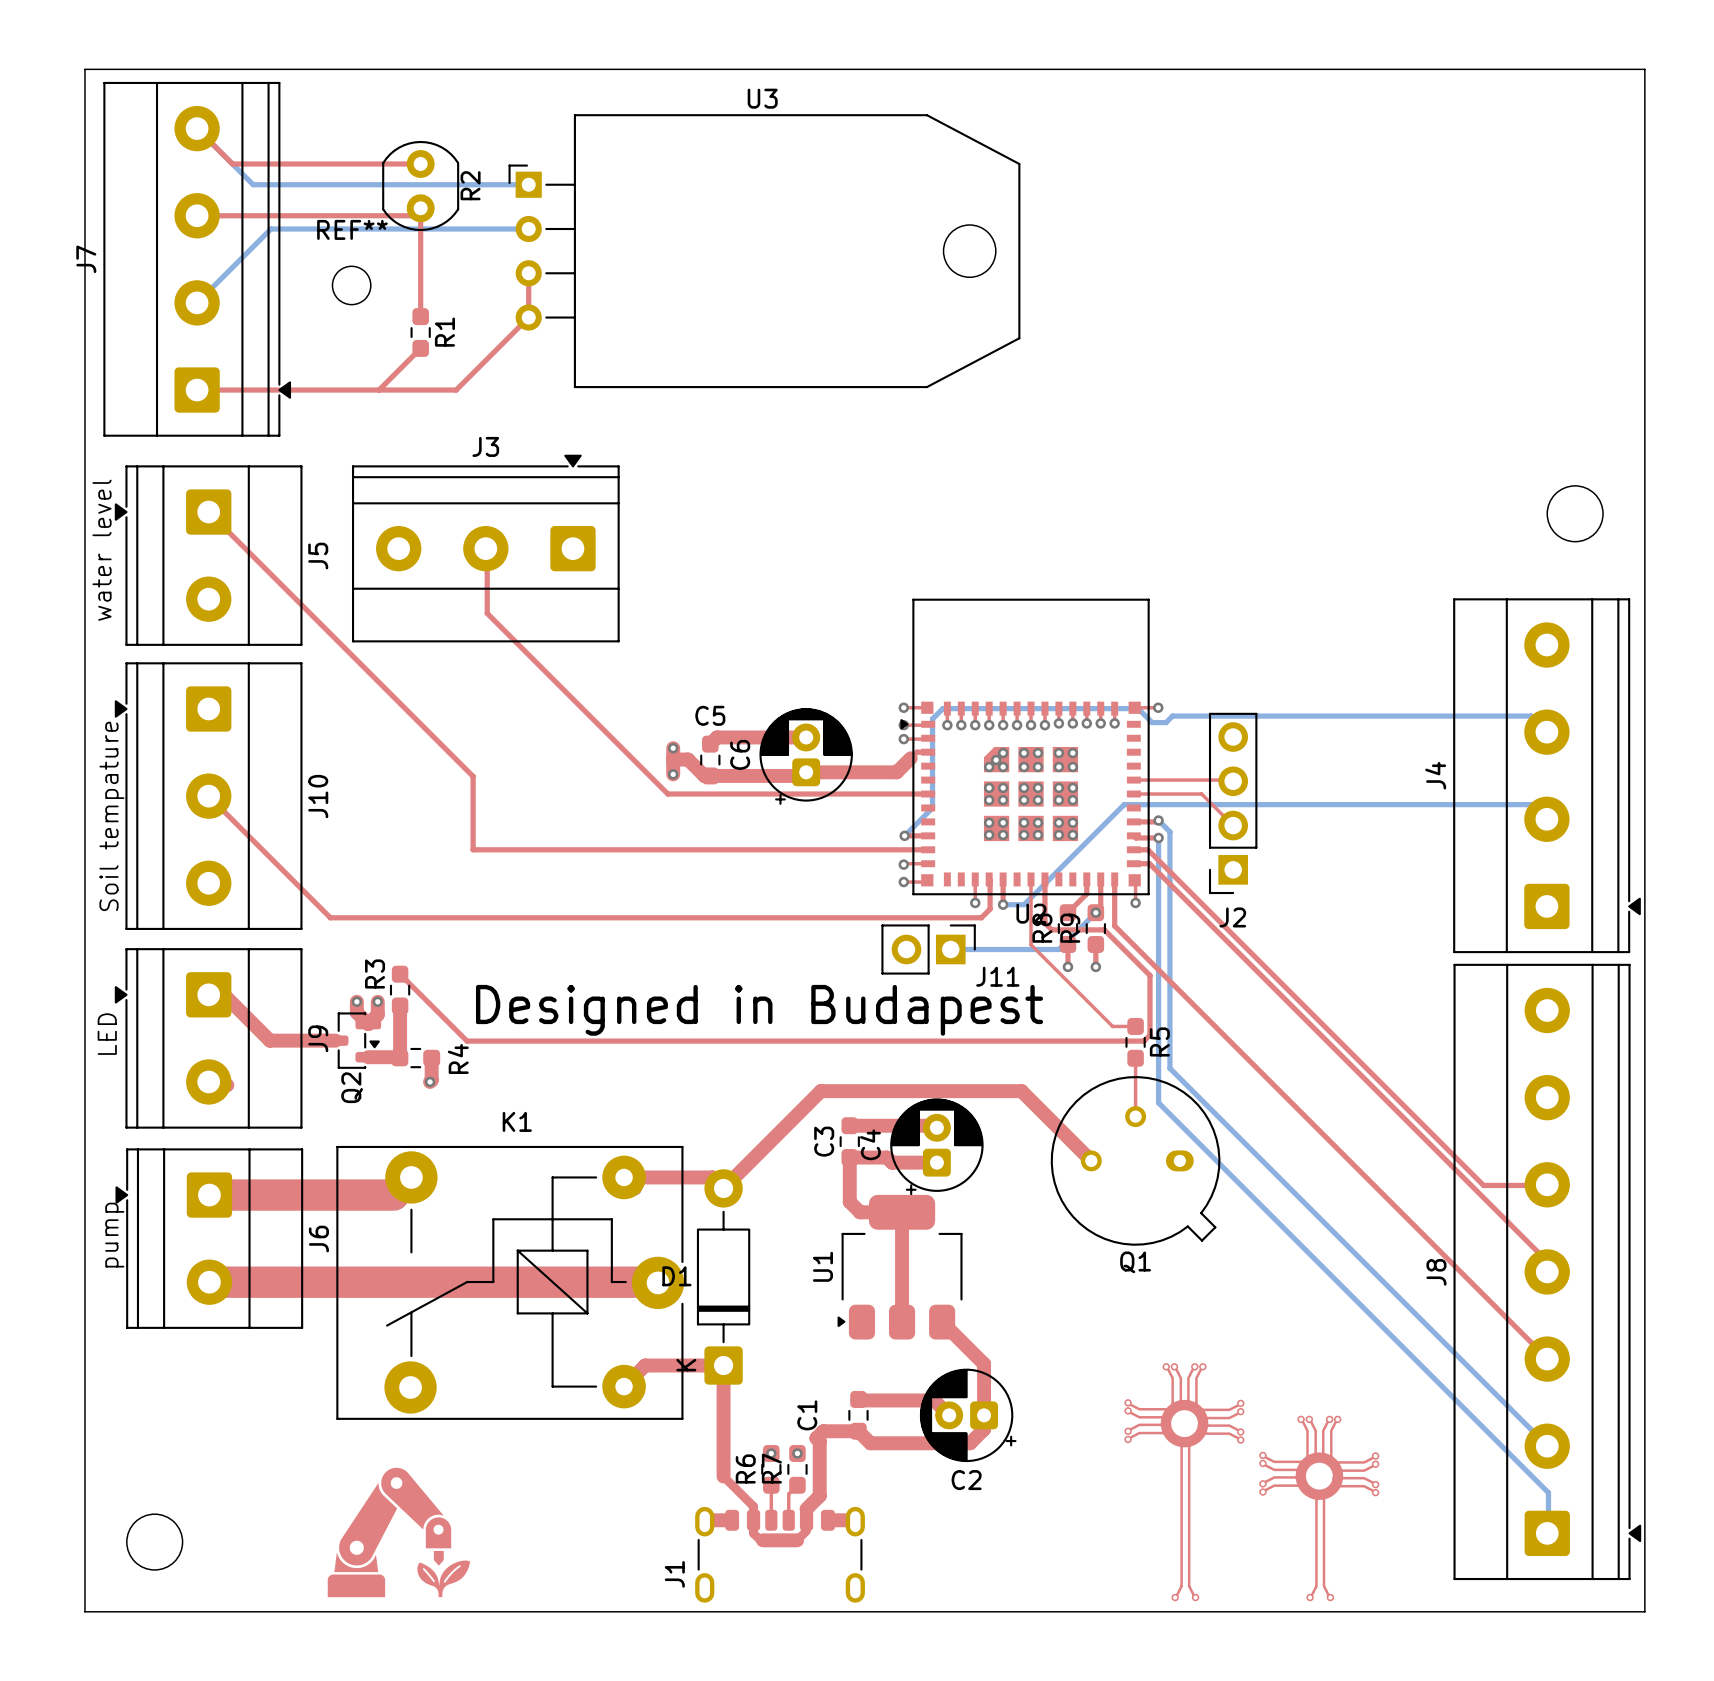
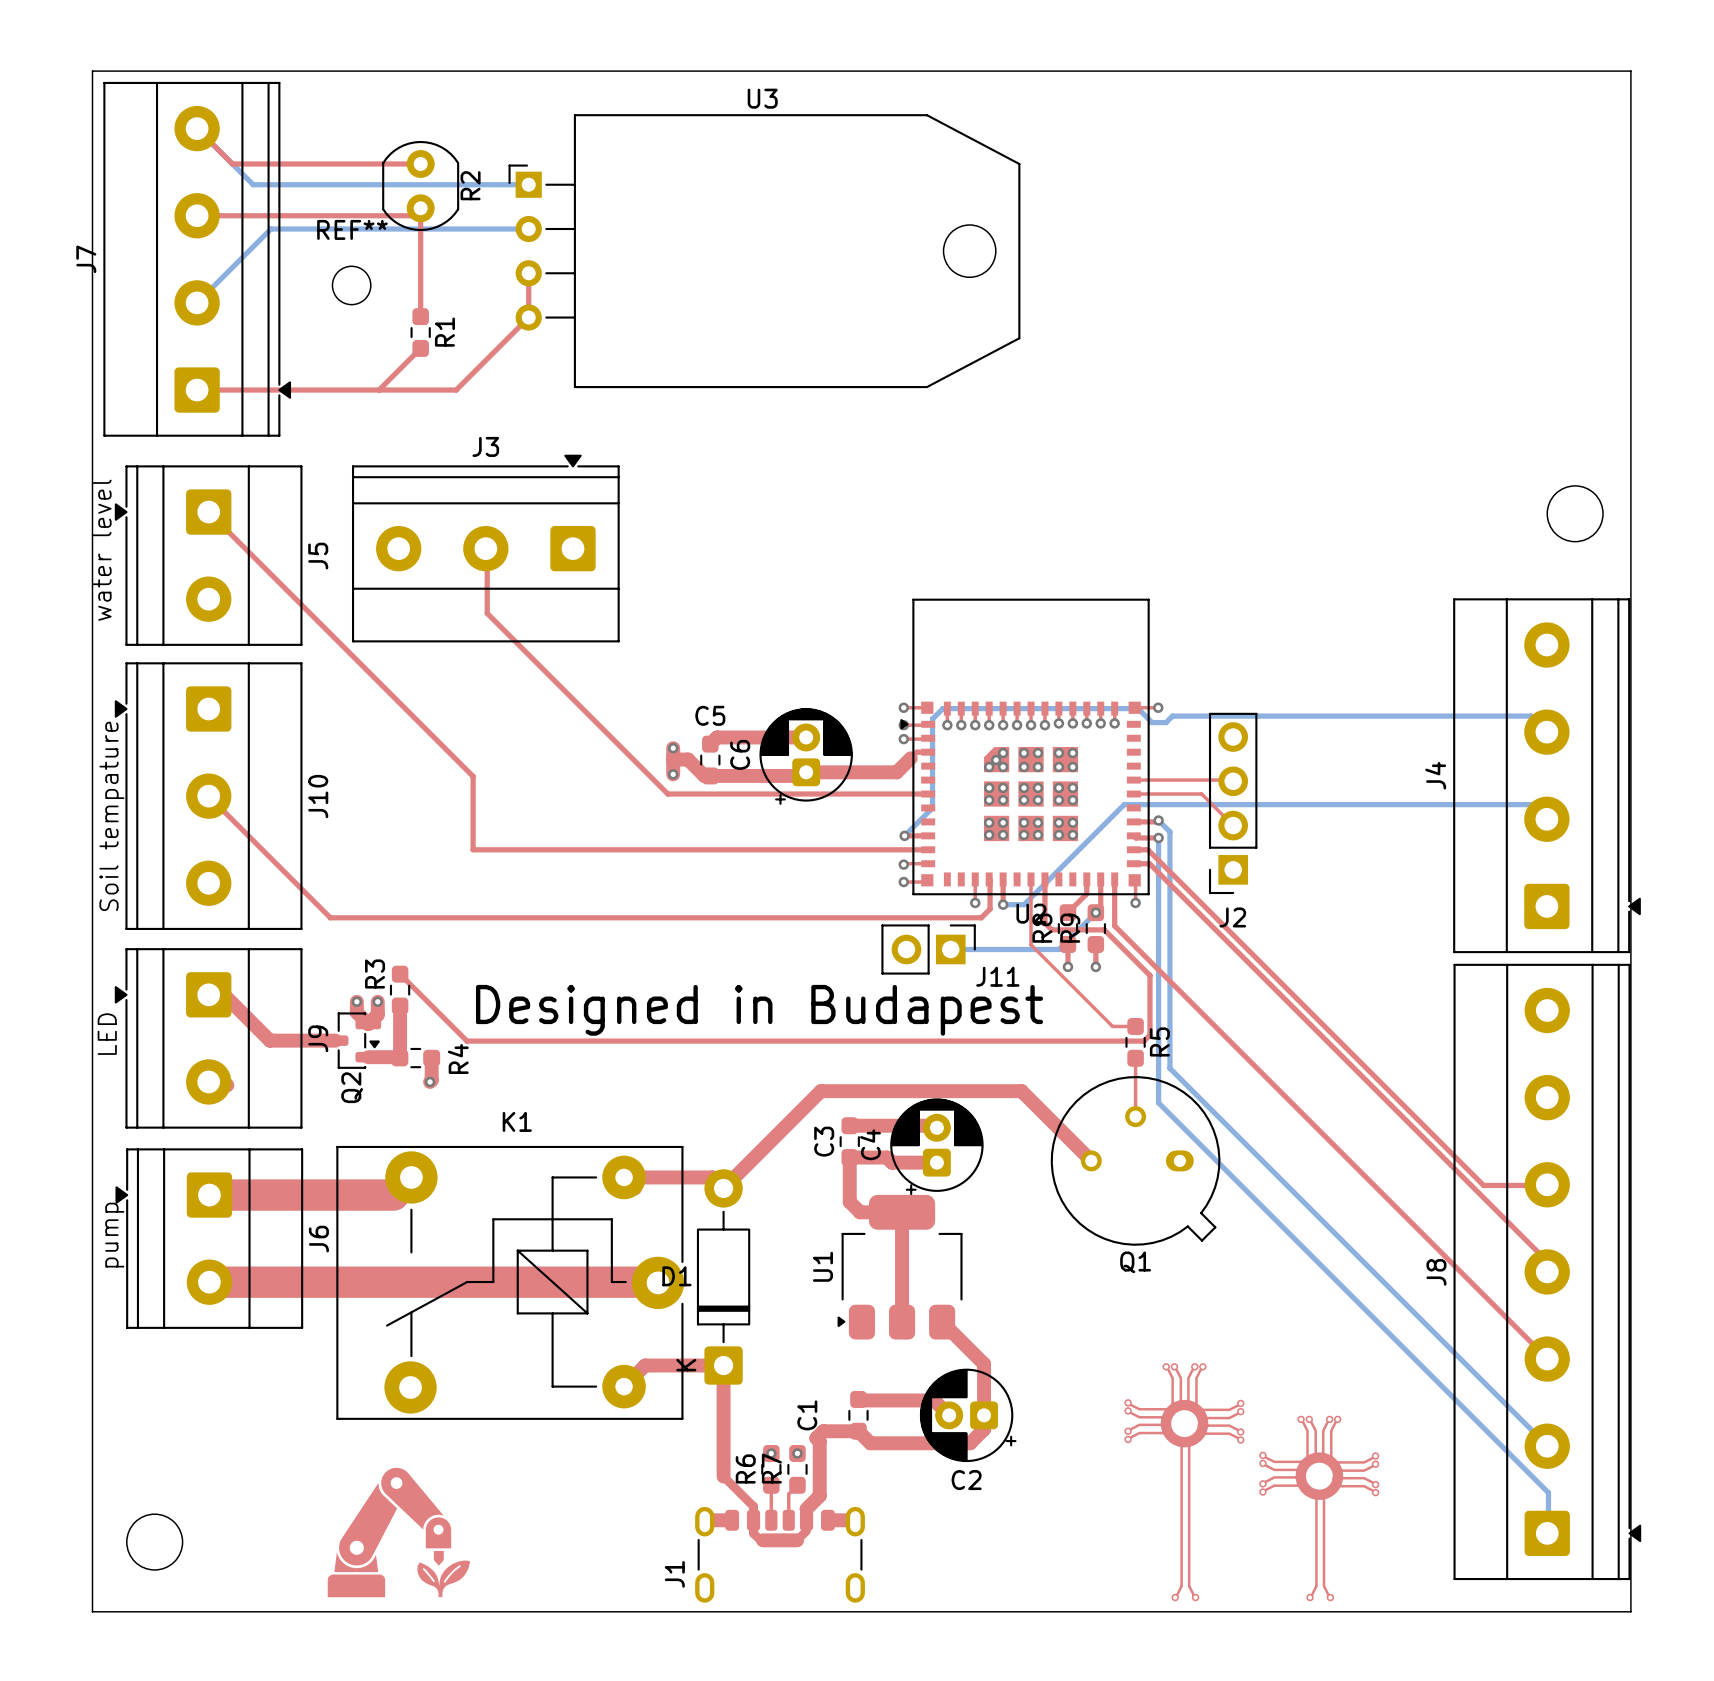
board edge: (92, 1611) (84, 1611) (84, 69) (1644, 69) (1644, 1611) (1630, 1611) -> (92, 1611) (92, 71) (1630, 71) (1630, 1611)

